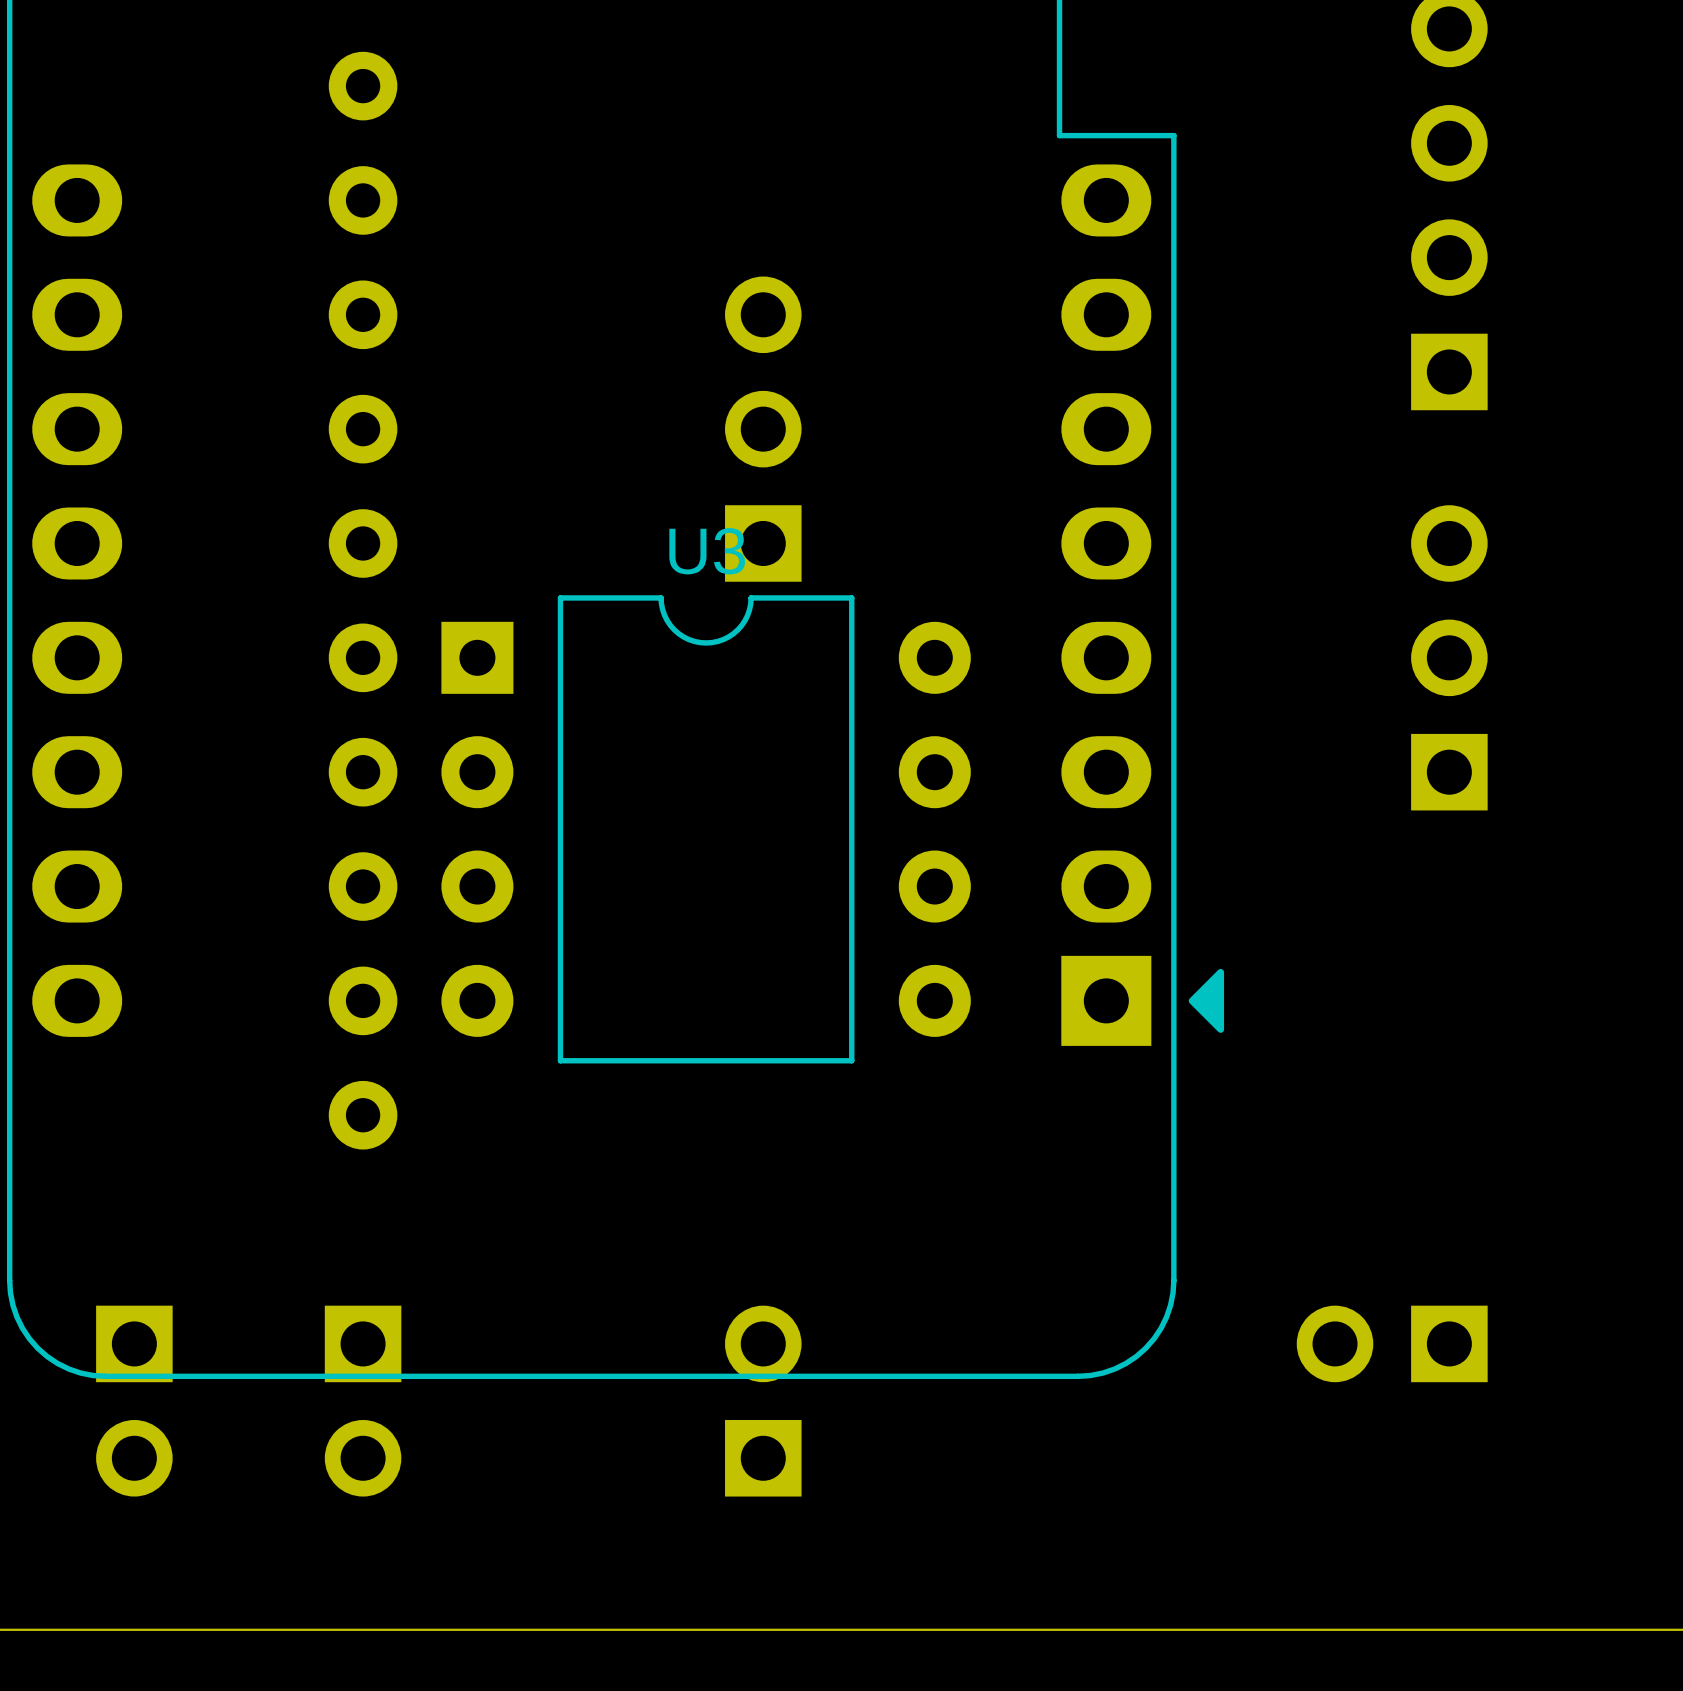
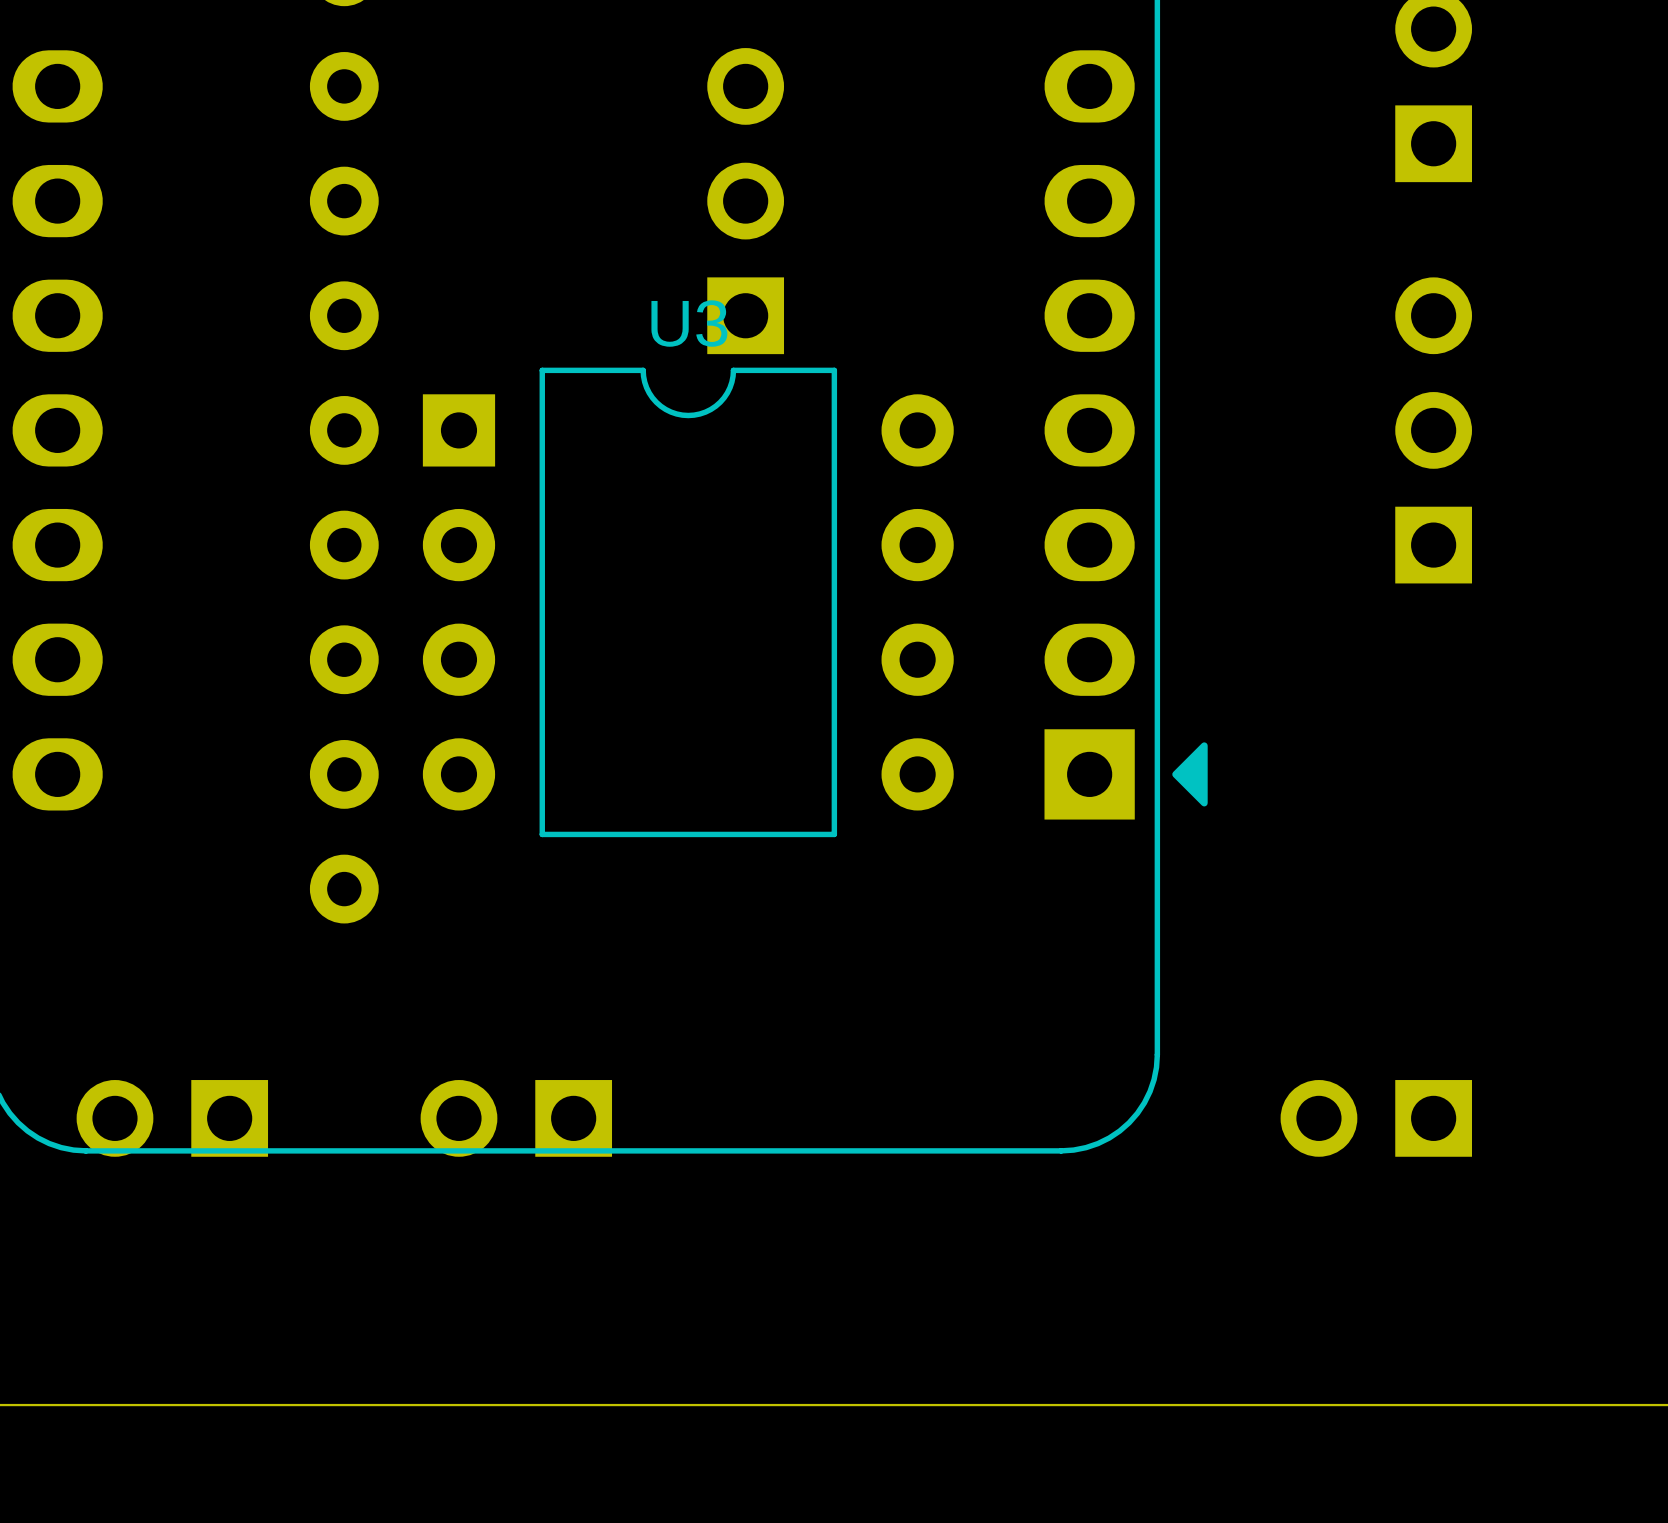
part: none -> (516, 1118)
part rotation: 0° (134, 1401) -> 90° clockwise (172, 1118)
part: (363, 1401) -> none
part: (763, 1401) -> none

